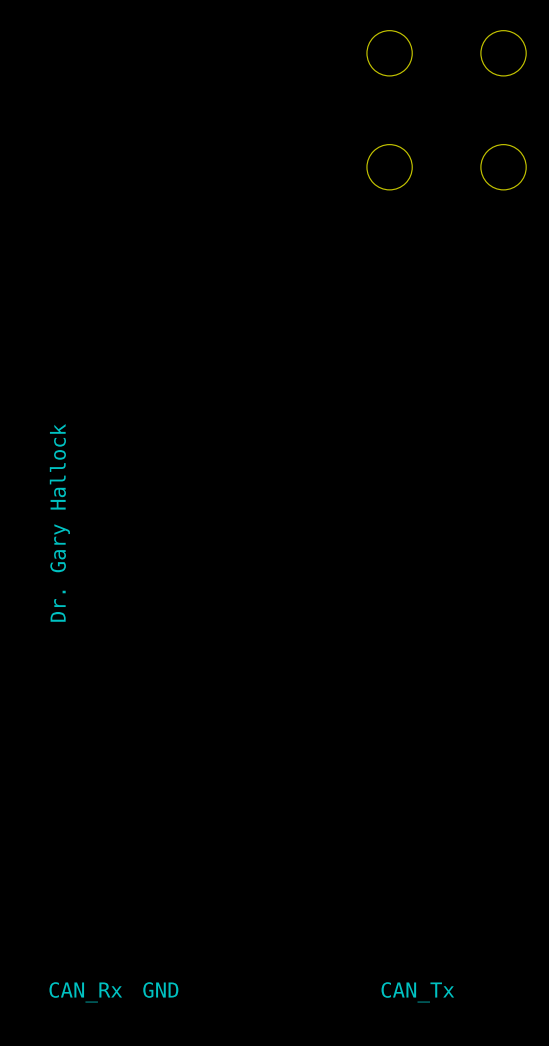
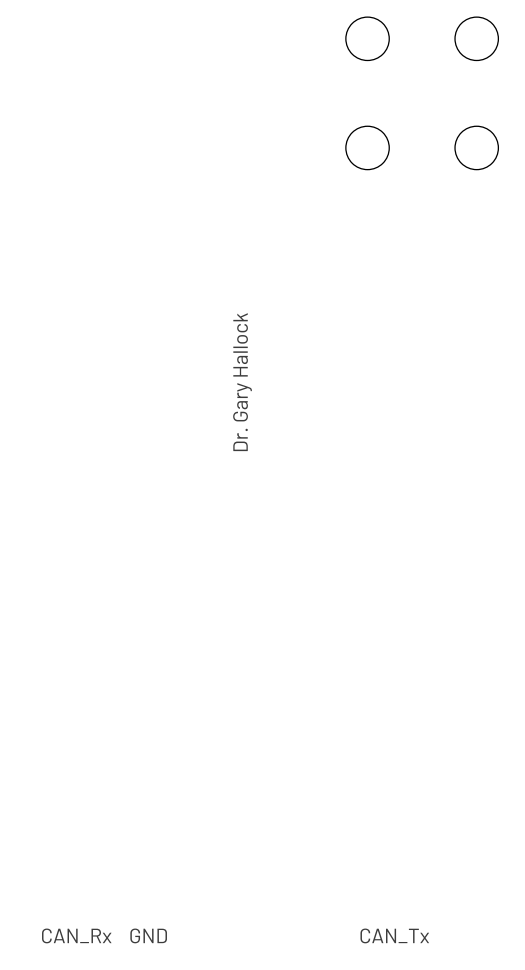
text position: Dr. Gary Hallock (59, 522) -> Dr. Gary Hallock (242, 382)

